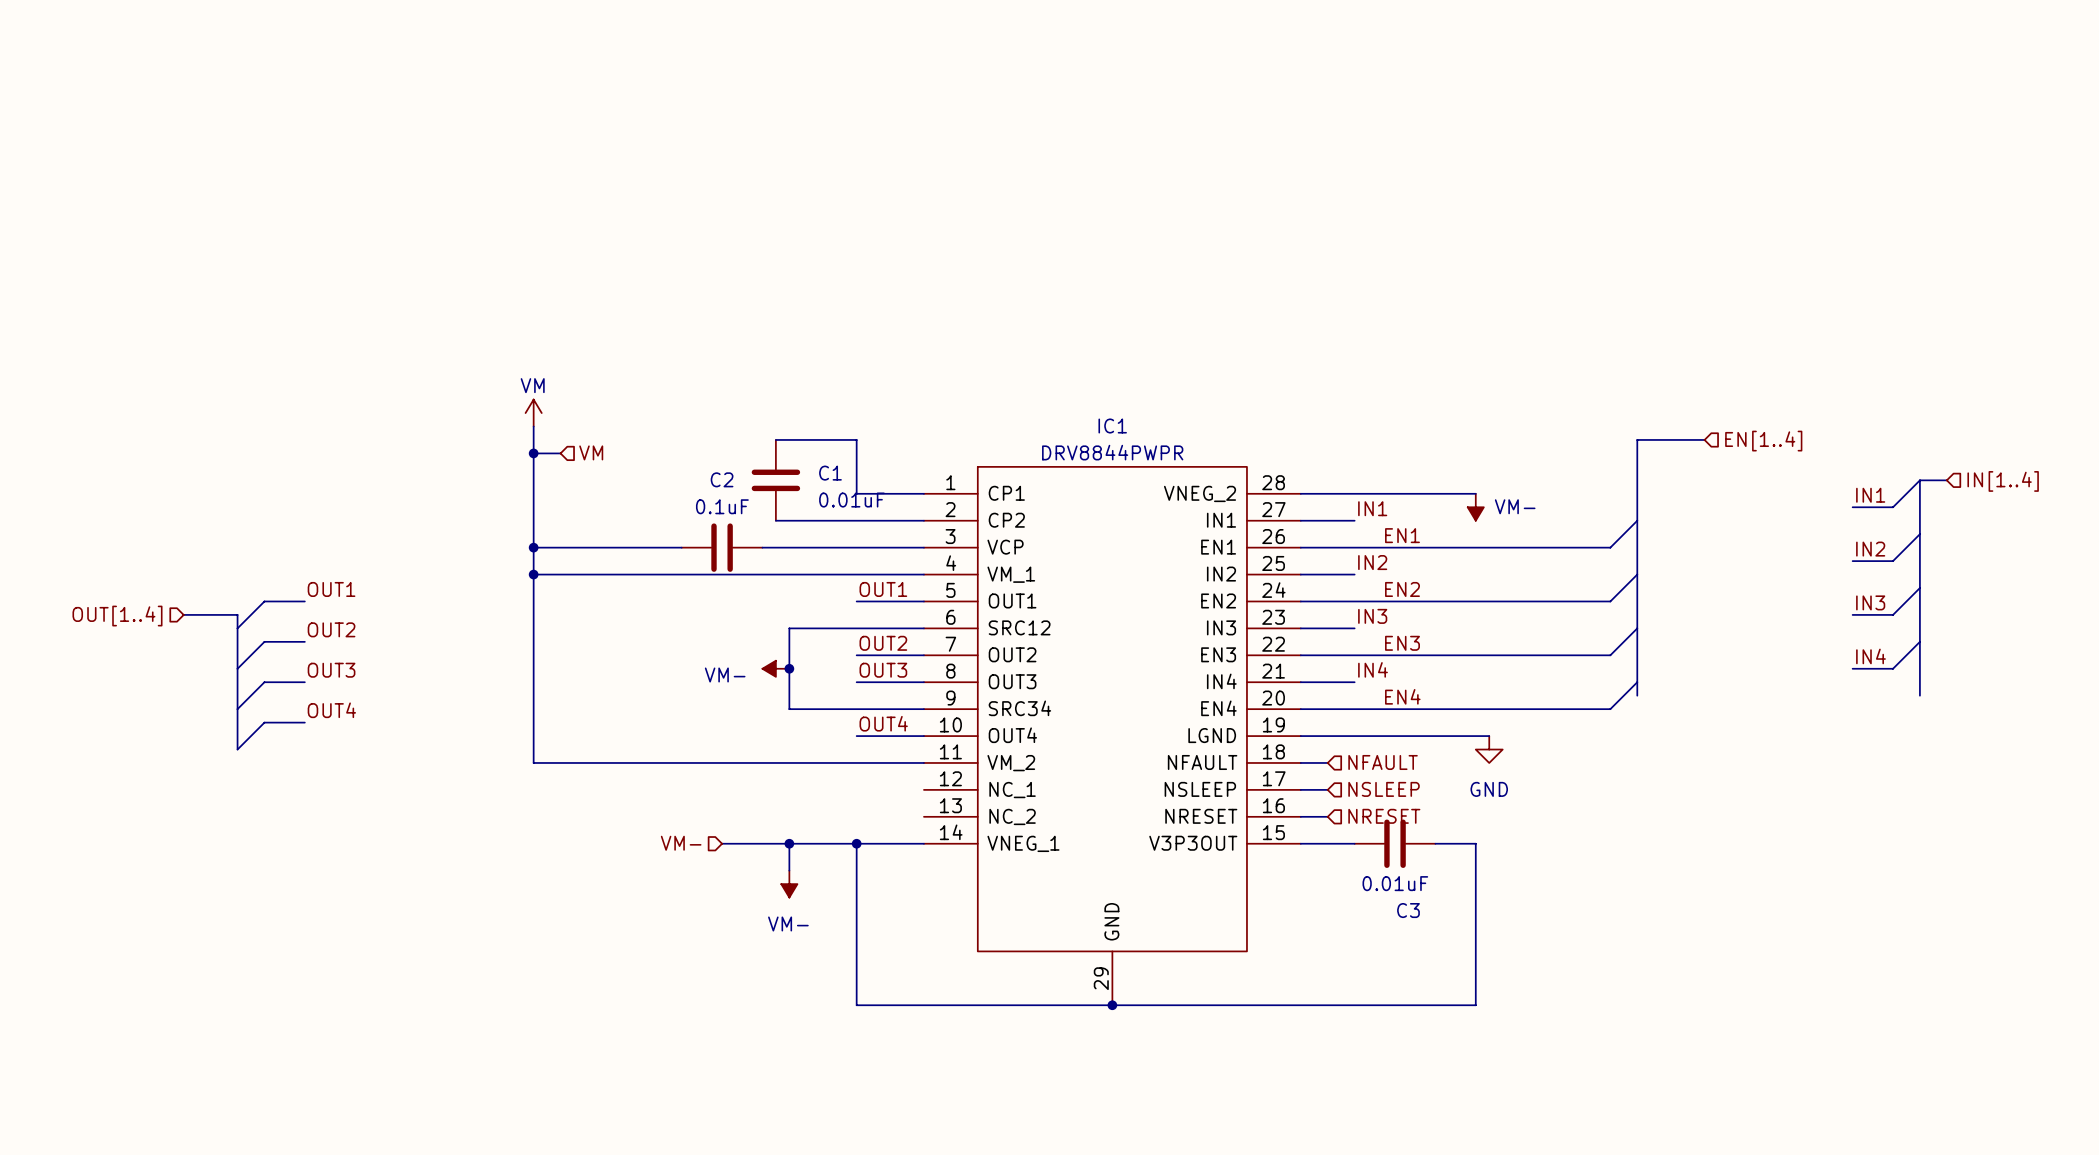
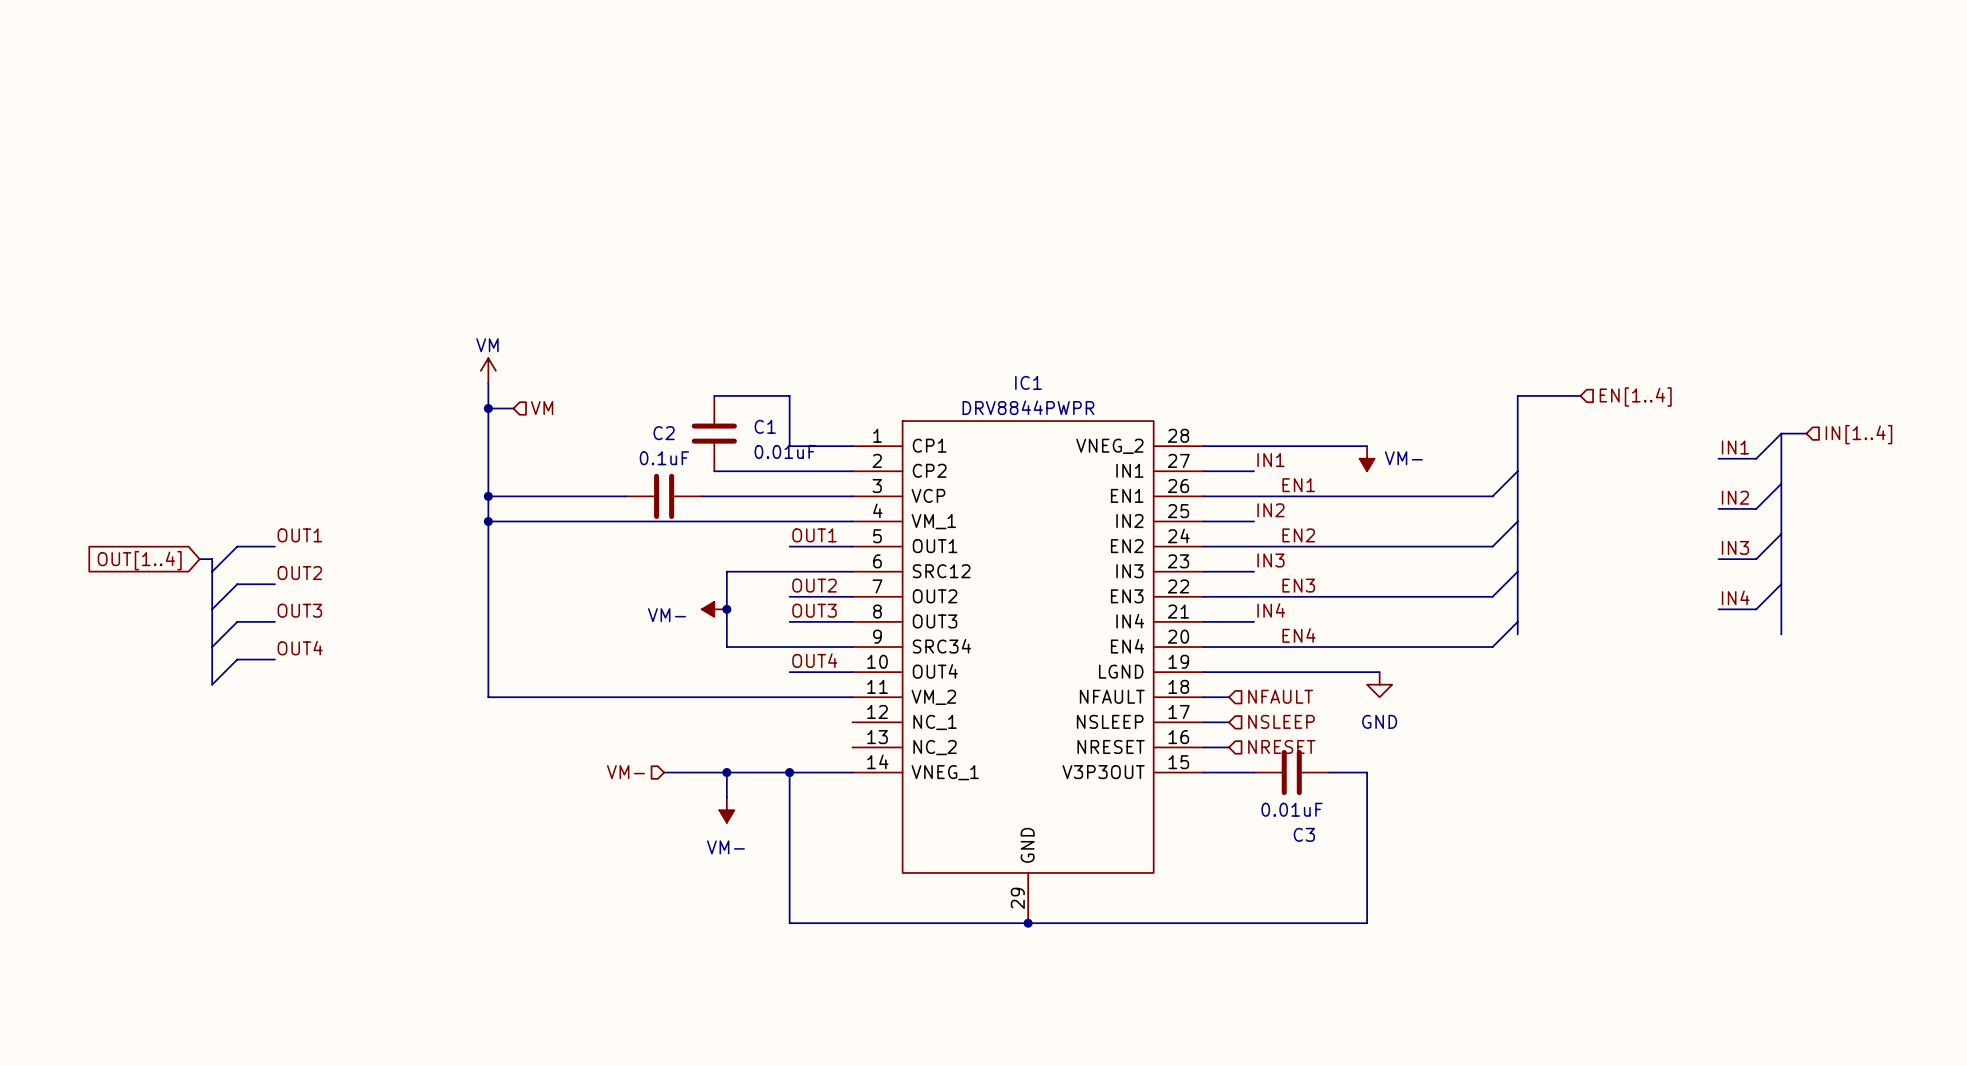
bus: (183, 614) (224, 614) -> none
hierarchical label: OUT[1..4] (117, 616) -> none
global label: none -> OUT[1..4] (139, 560)

